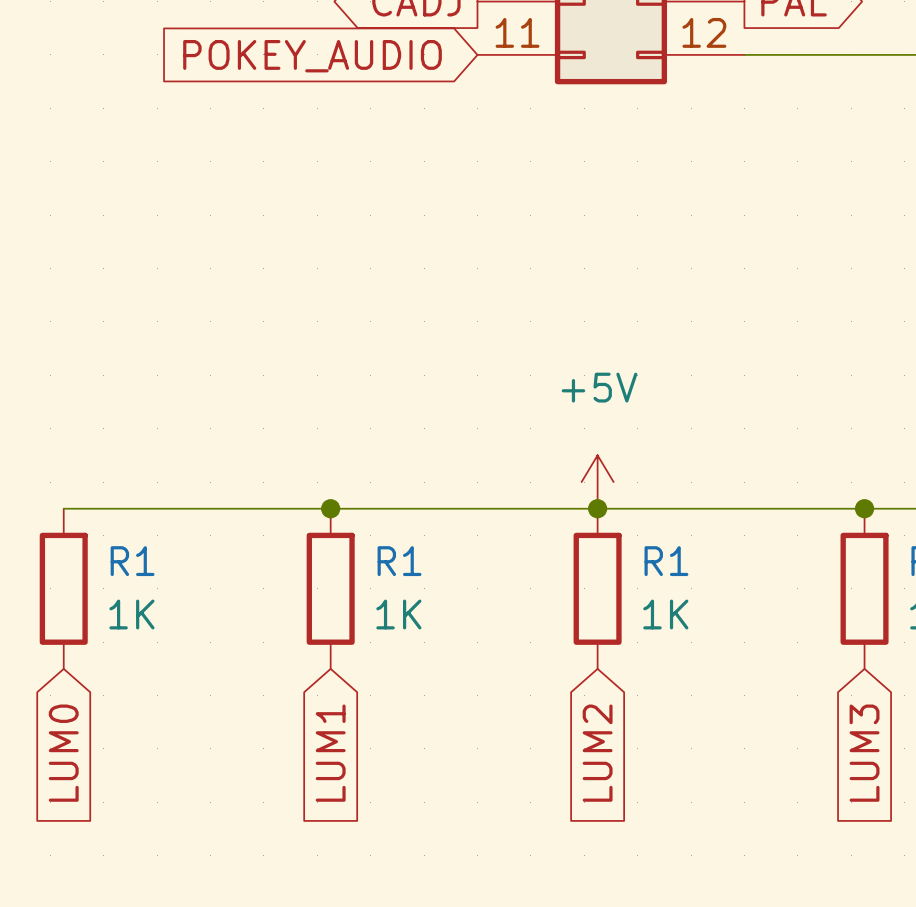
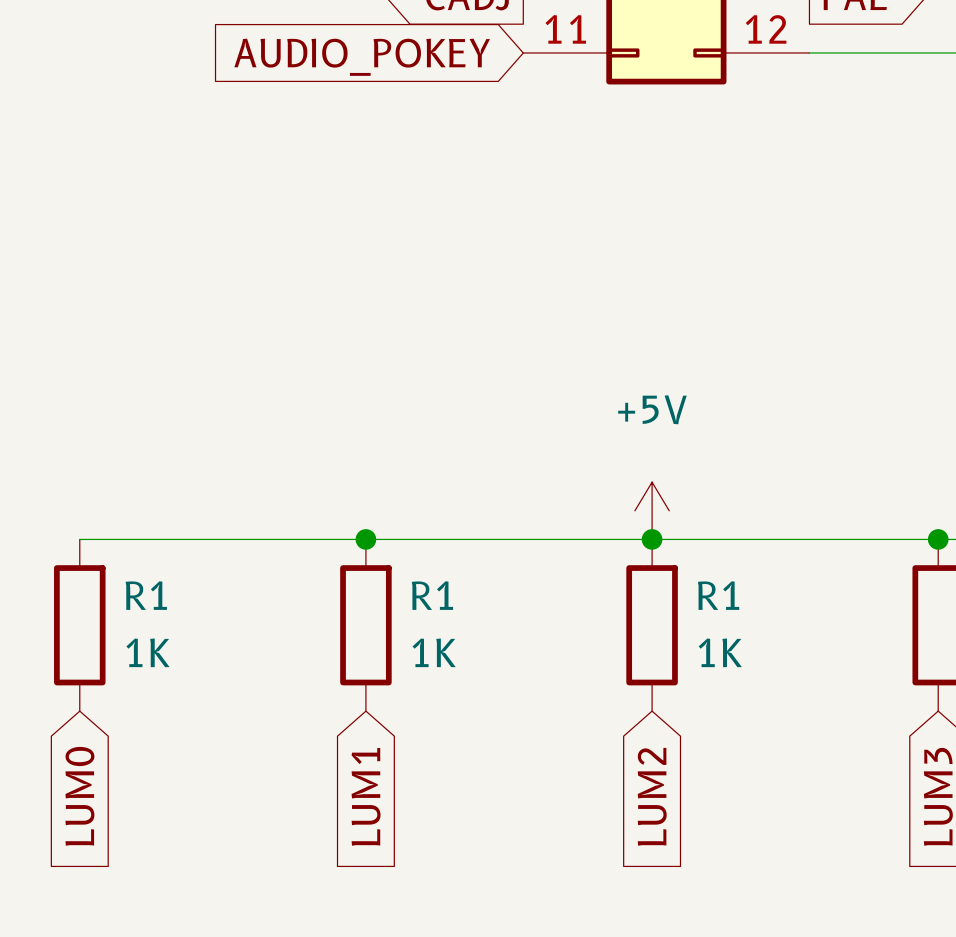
global label: POKEY_AUDIO (312, 56) -> AUDIO_POKEY (362, 57)

